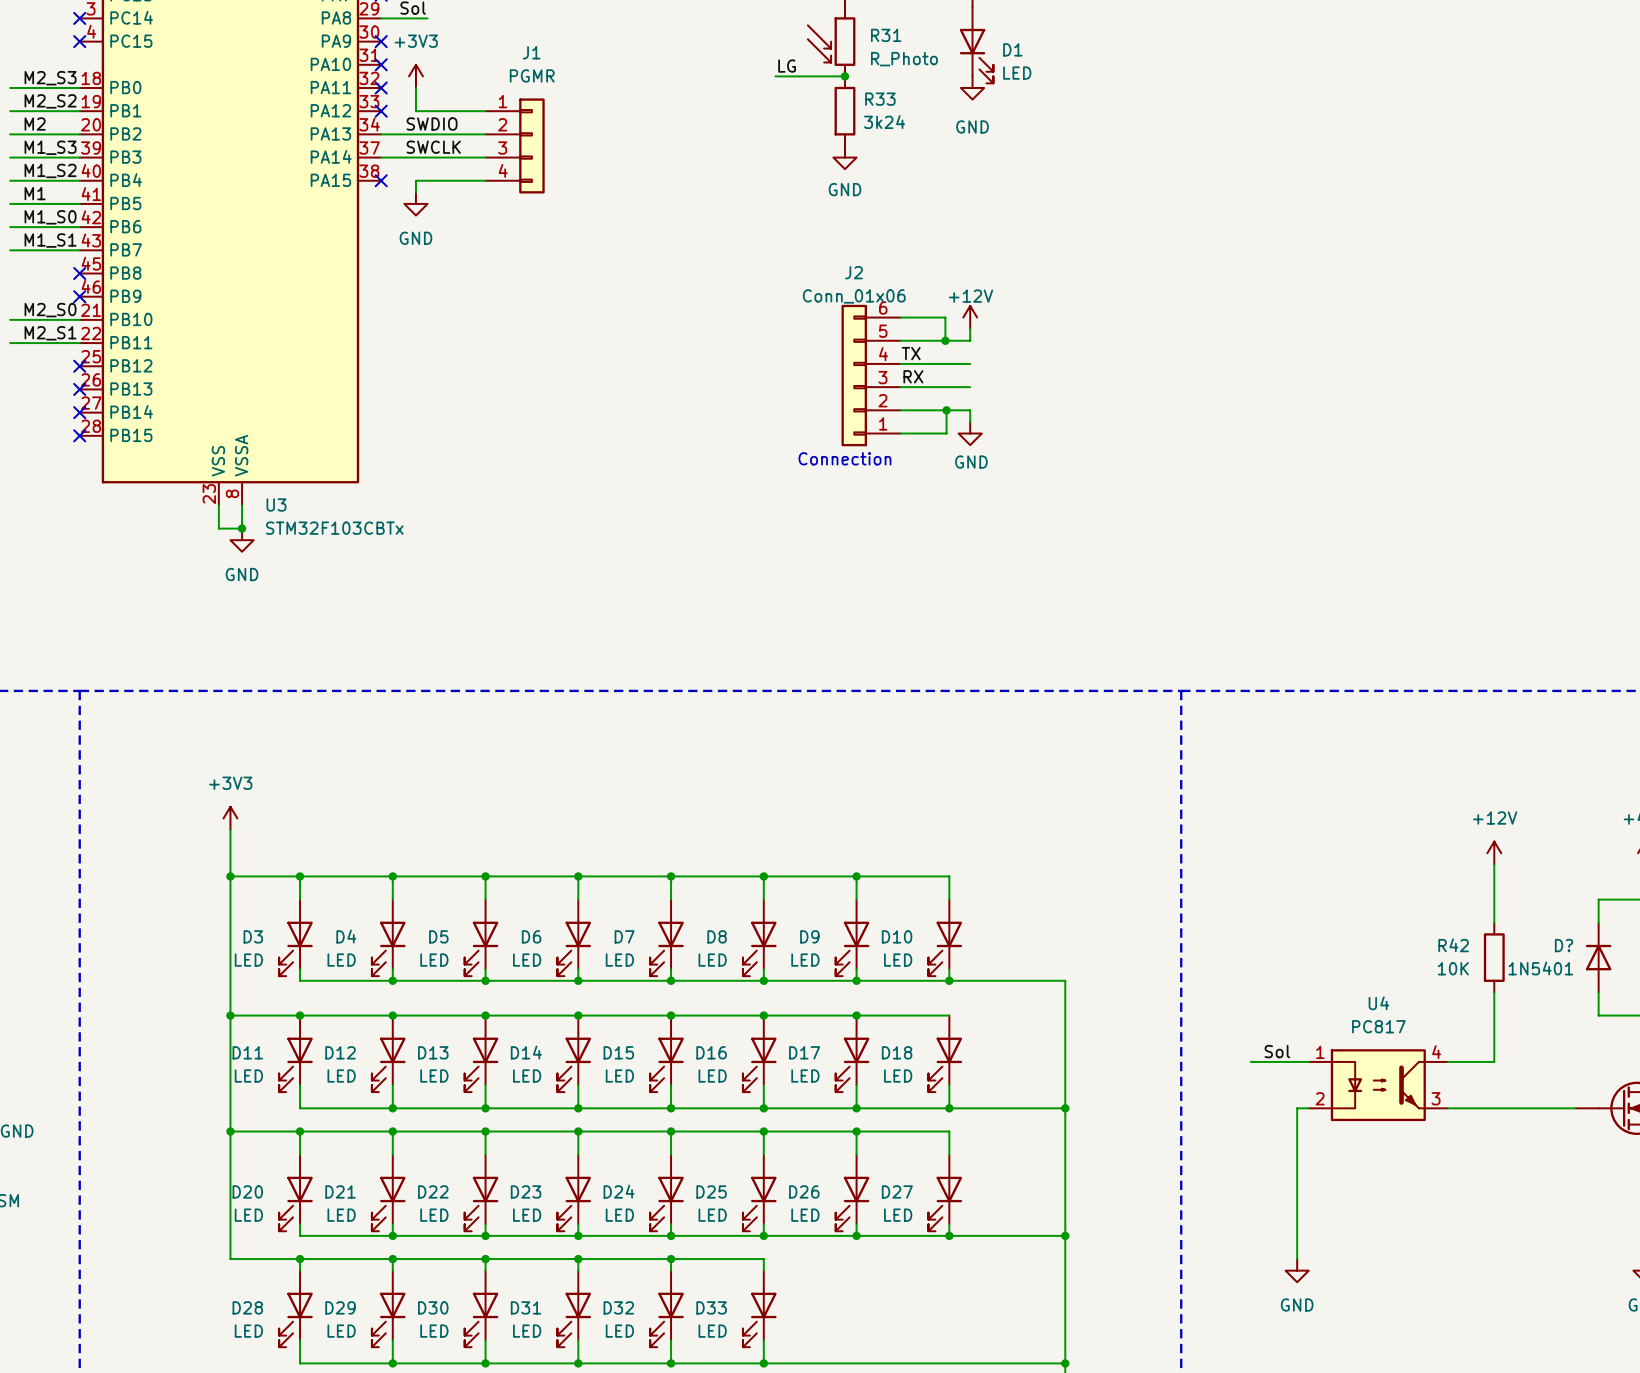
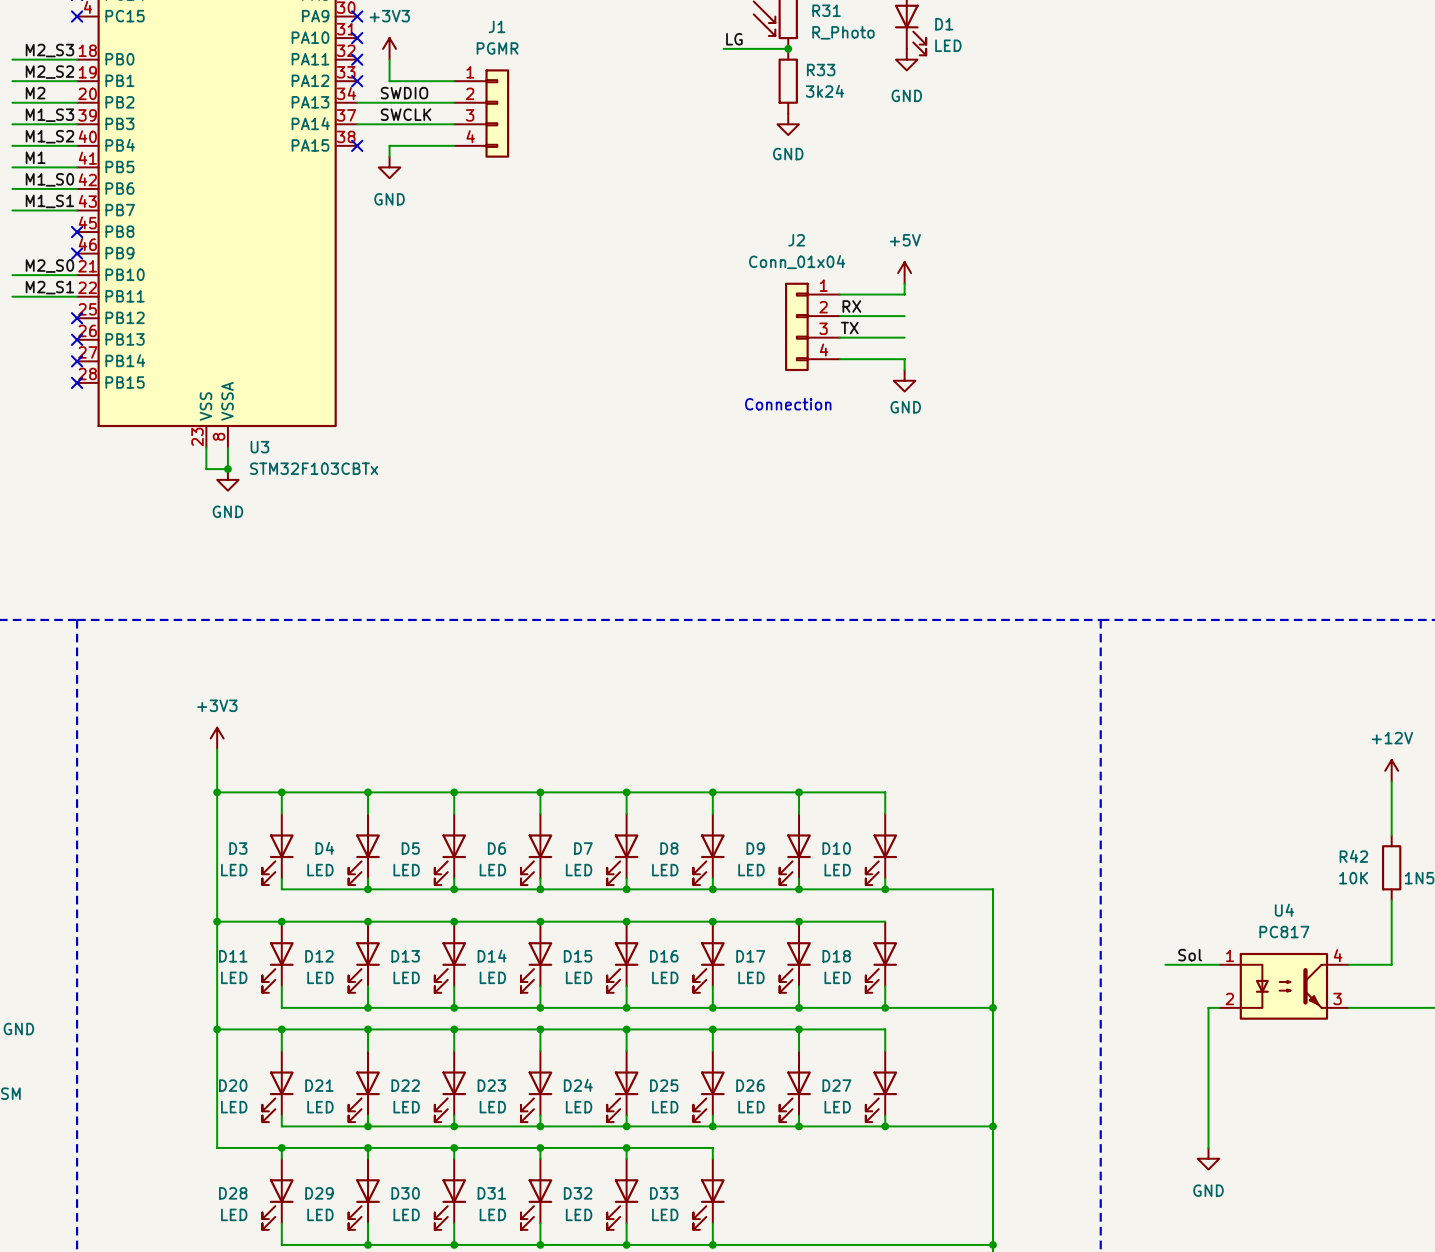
J2 value: Conn_01x06 (854, 296) -> Conn_01x04 (797, 262)
J2 symbol: [841, 304, 901, 447] -> [785, 282, 840, 372]
wire: (900, 317) (945, 317) (945, 340) -> none
power symbol: +12V (970, 317) -> +5V (904, 272)
junction: (945, 340) -> none
label: TX (911, 353) -> RX (851, 306)
label: RX (913, 376) -> TX (849, 328)
wire: (946, 410) (946, 433) (900, 433) -> none
junction: (946, 410) -> none

